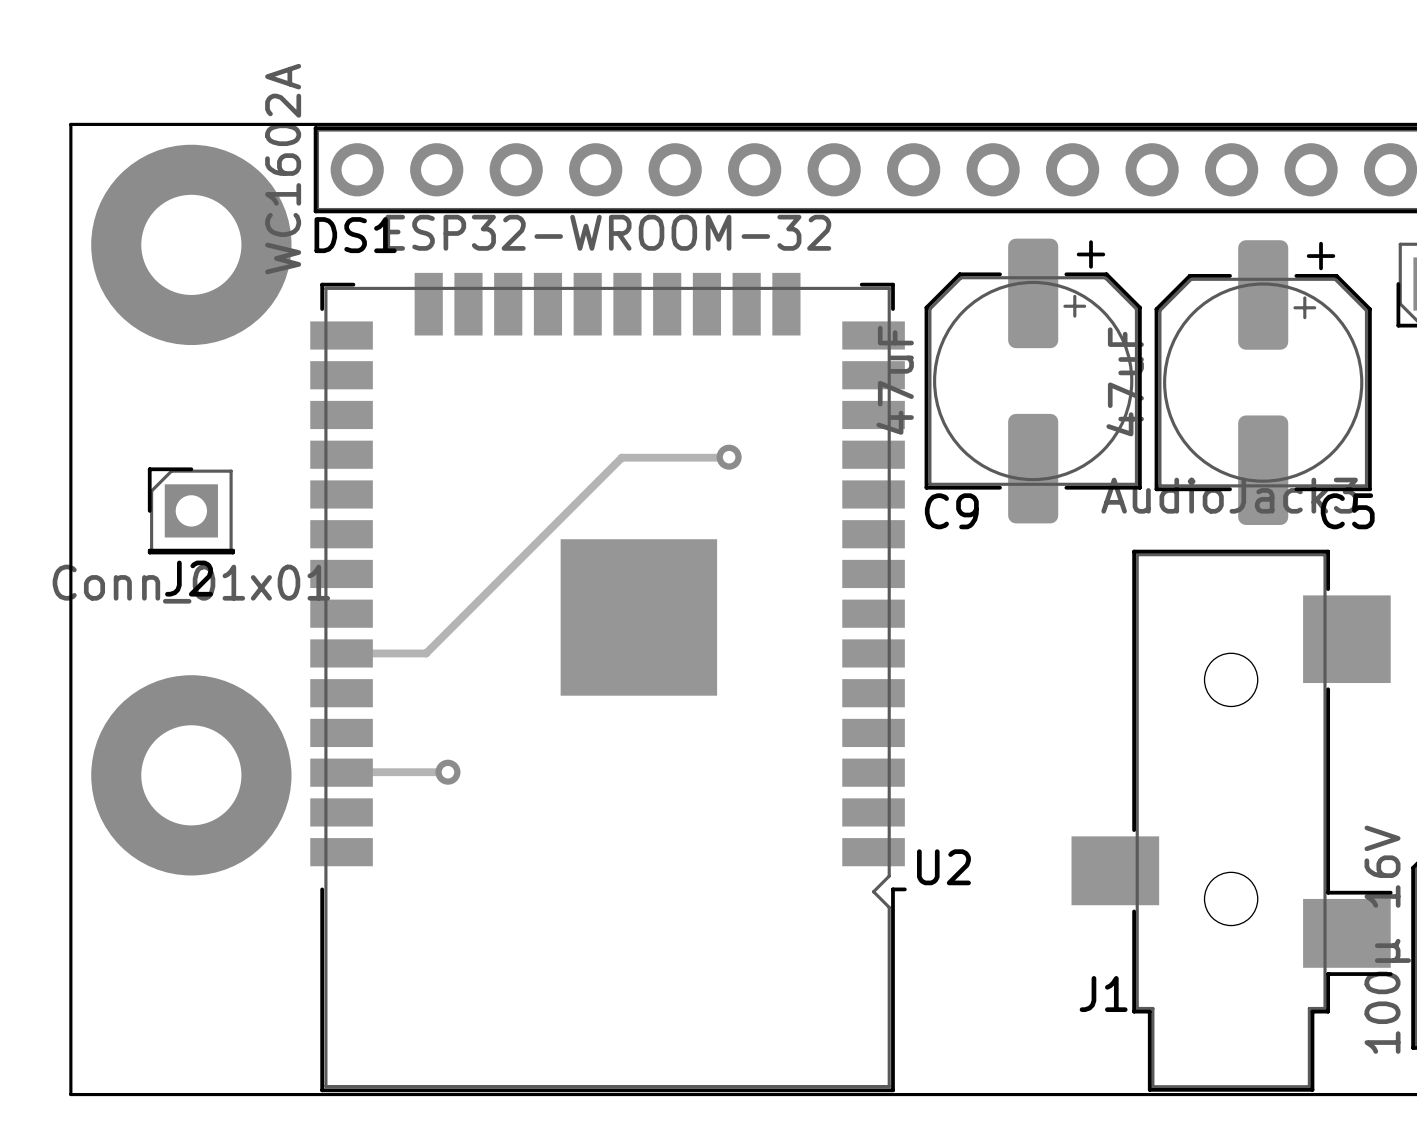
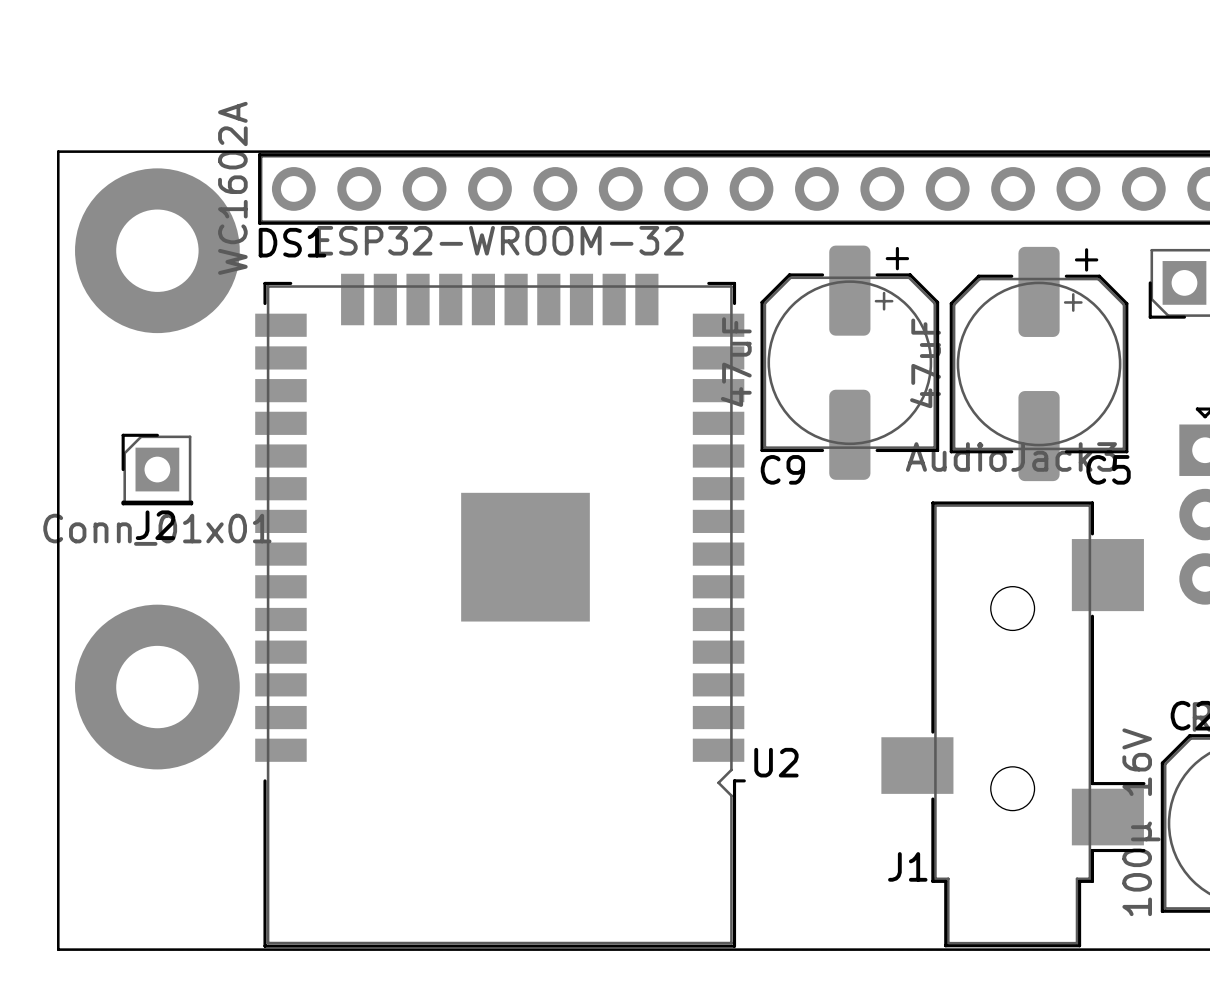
track: (729, 457) (621, 457) (426, 653) (341, 653) -> none
via: (729, 457) -> none
track: (447, 772) (341, 772) -> none
via: (447, 772) -> none

